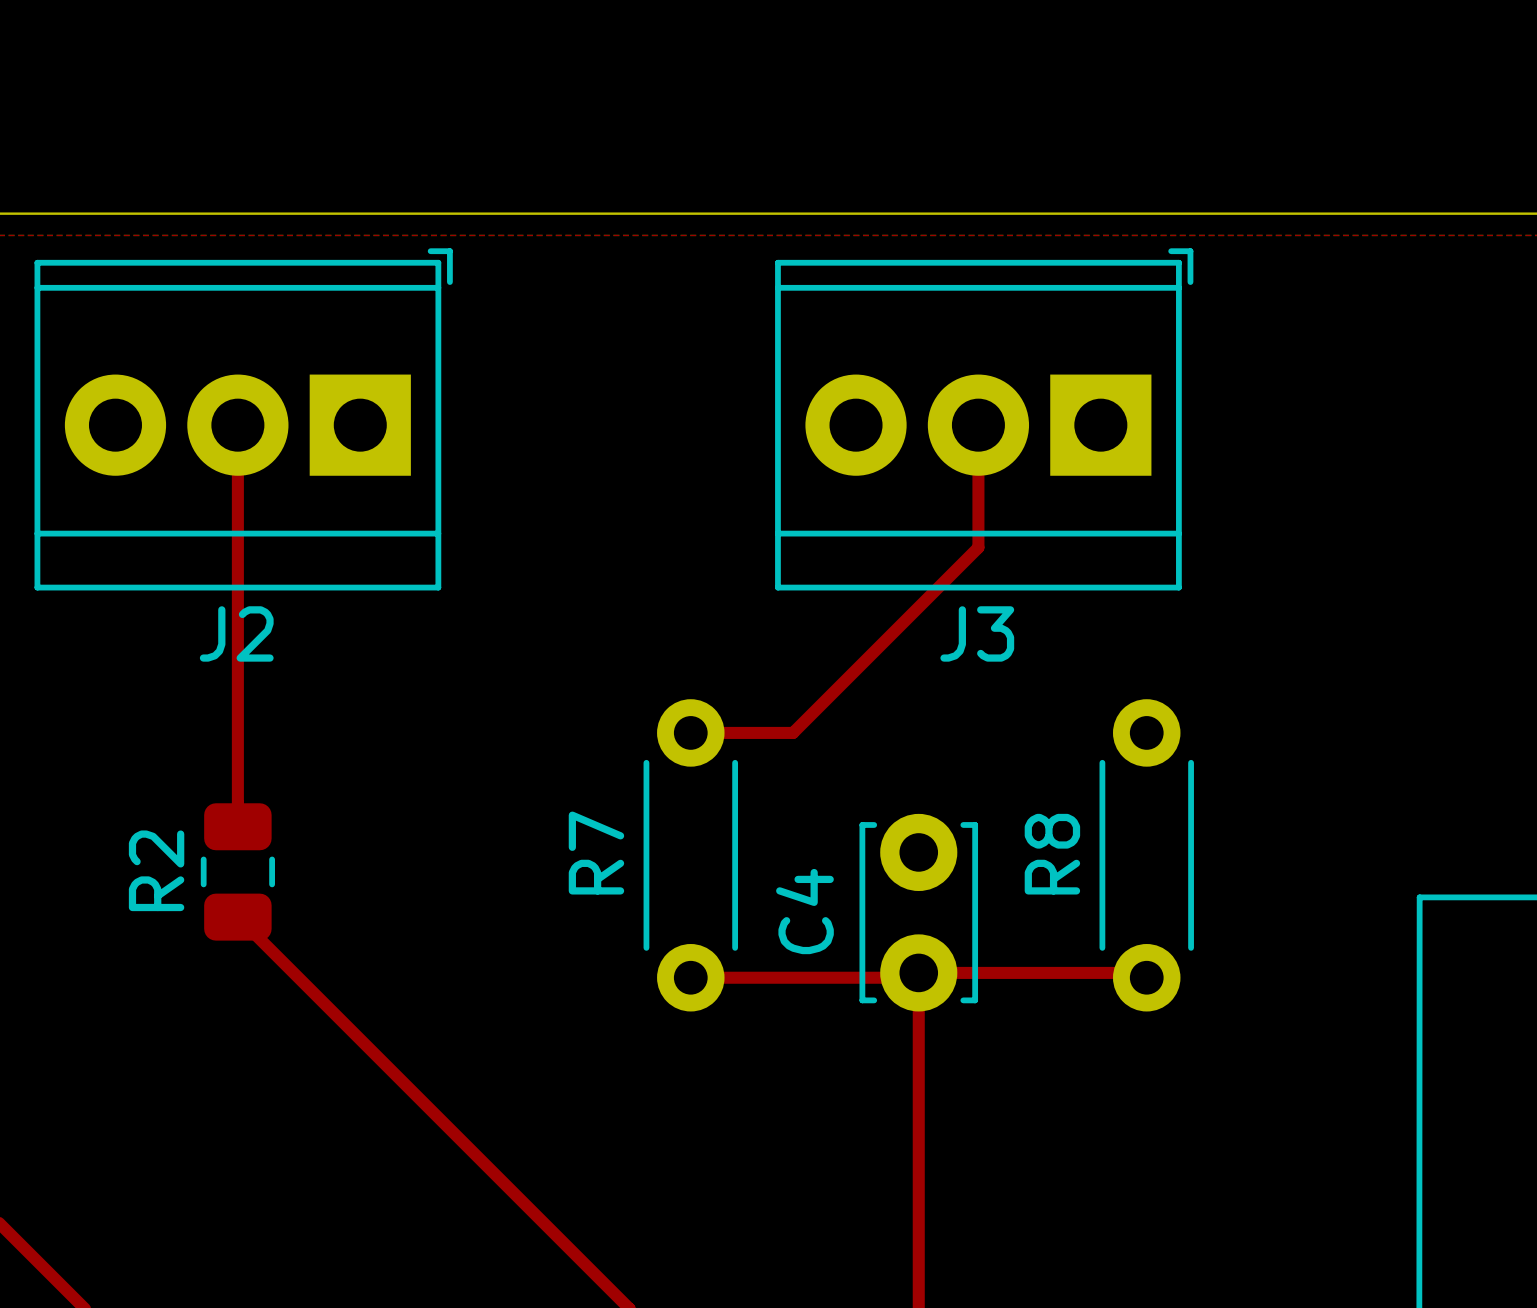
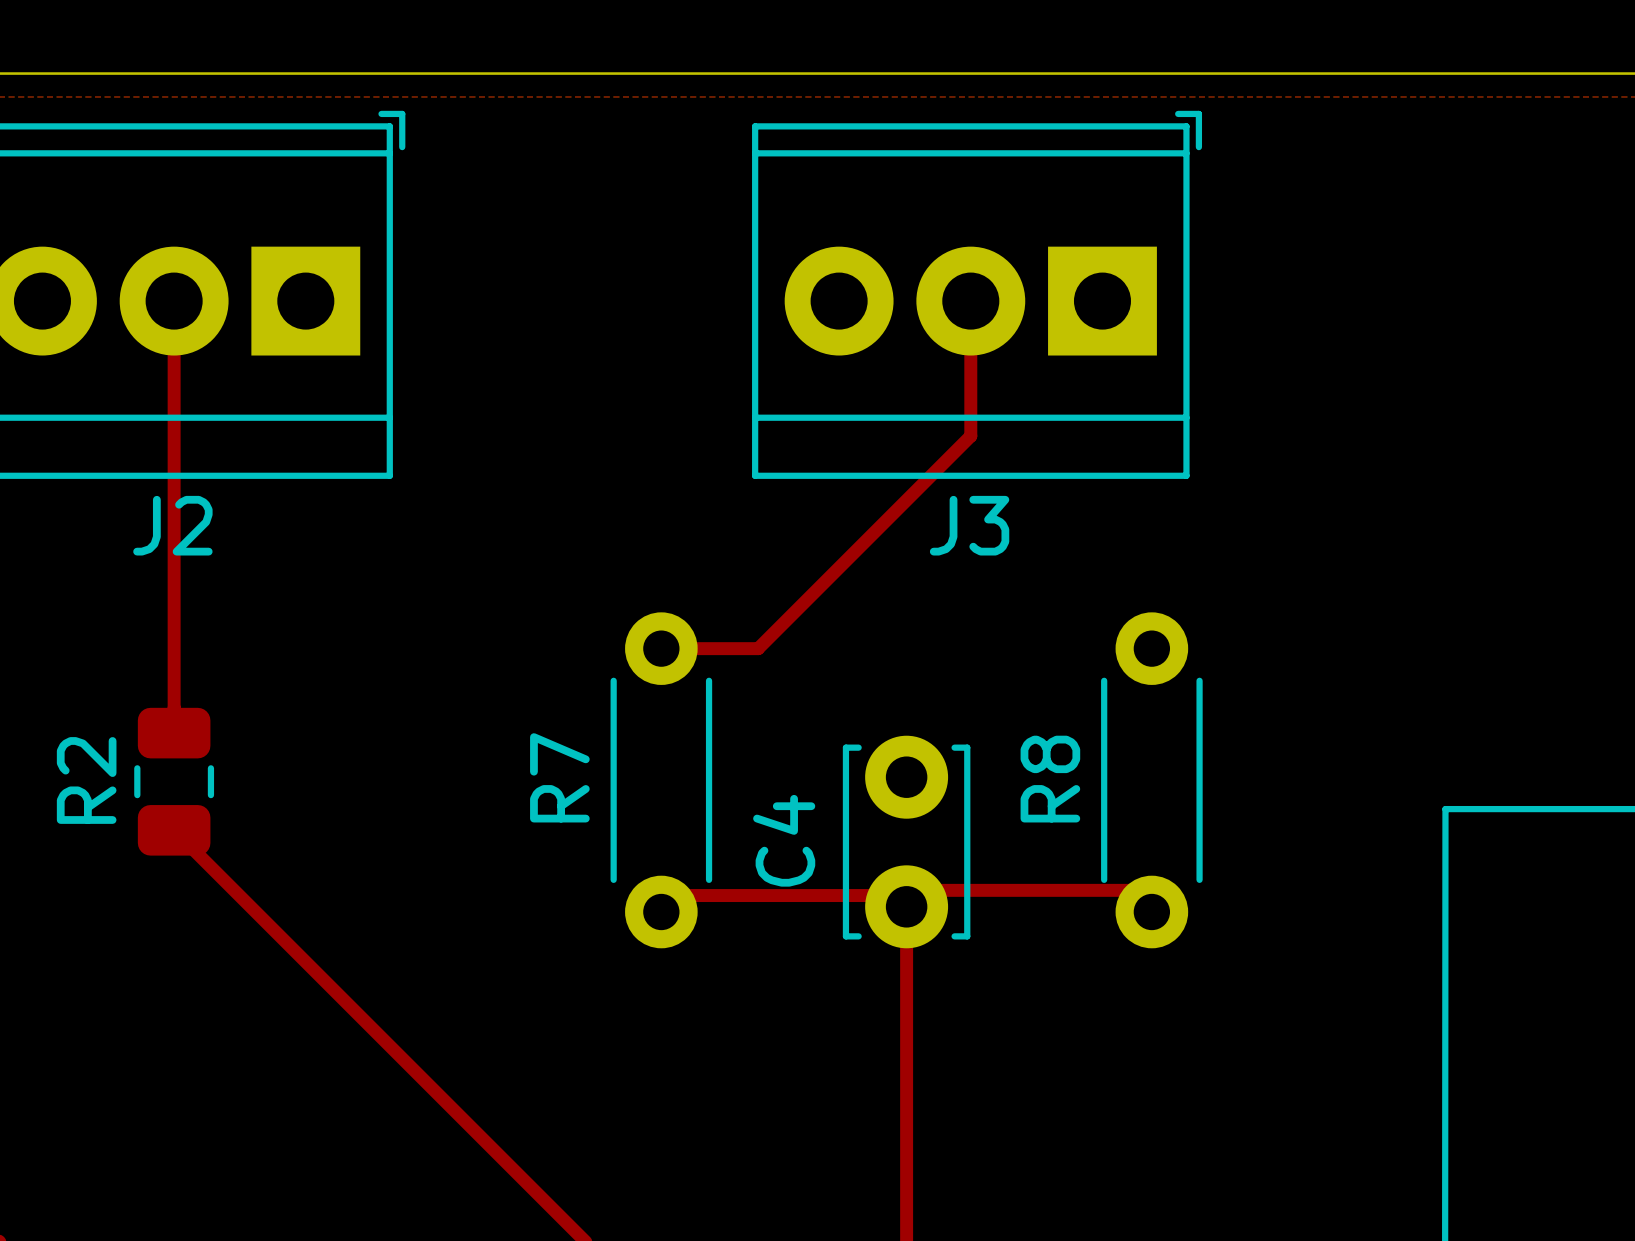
top track: (978, 547) (793, 732) (690, 732) -> (970, 432) (970, 436) (758, 648) (661, 648)
R7 position: (690, 855) -> (661, 780)
R8 position: (1146, 855) -> (1151, 780)
C4 position: (918, 912) -> (906, 842)

